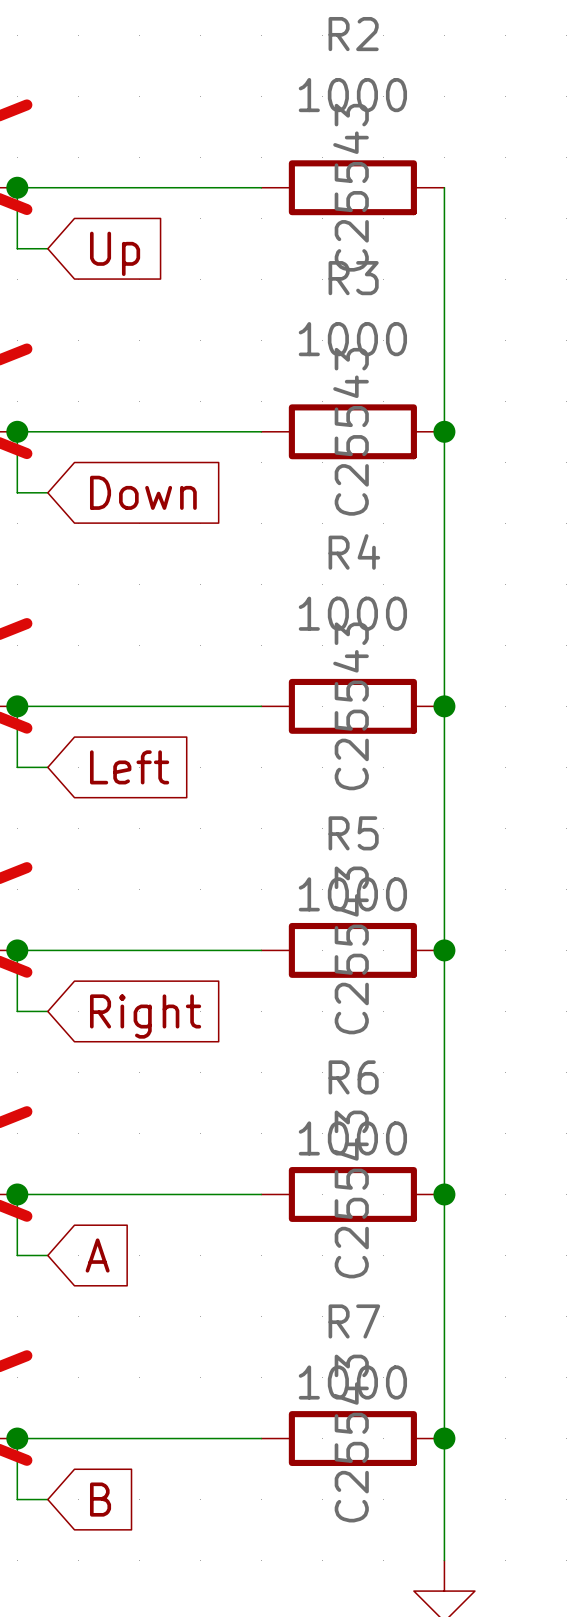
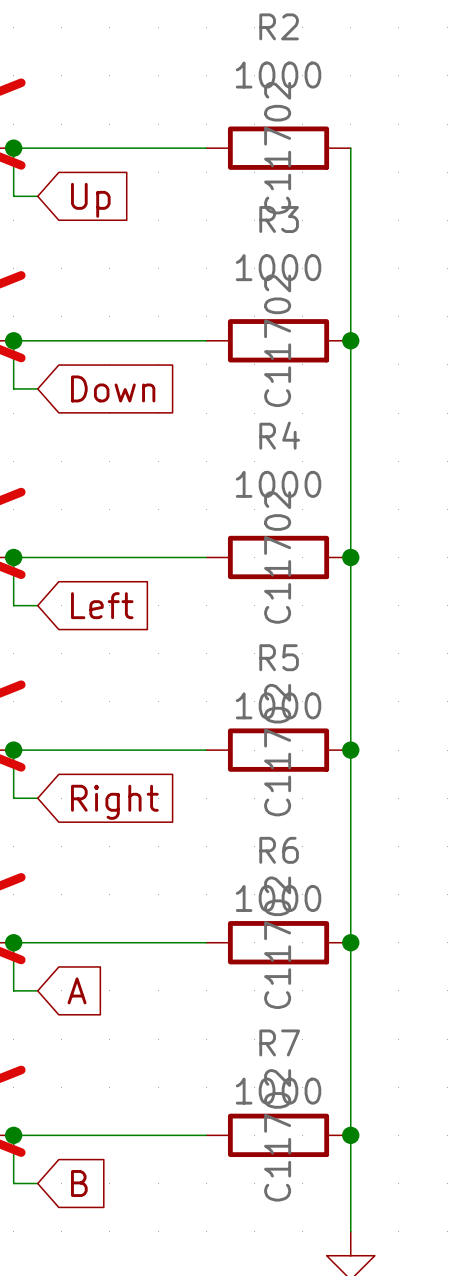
R2 text: C25543 (351, 187) -> C11702 (277, 148)
R3 text: C25543 (351, 431) -> C11702 (277, 340)
R4 text: C25543 (351, 706) -> C11702 (277, 557)
R5 text: C25543 (351, 950) -> C11702 (277, 750)
R6 text: C25543 (351, 1194) -> C11702 (277, 942)
R7 text: C25543 (351, 1438) -> C11702 (277, 1135)

